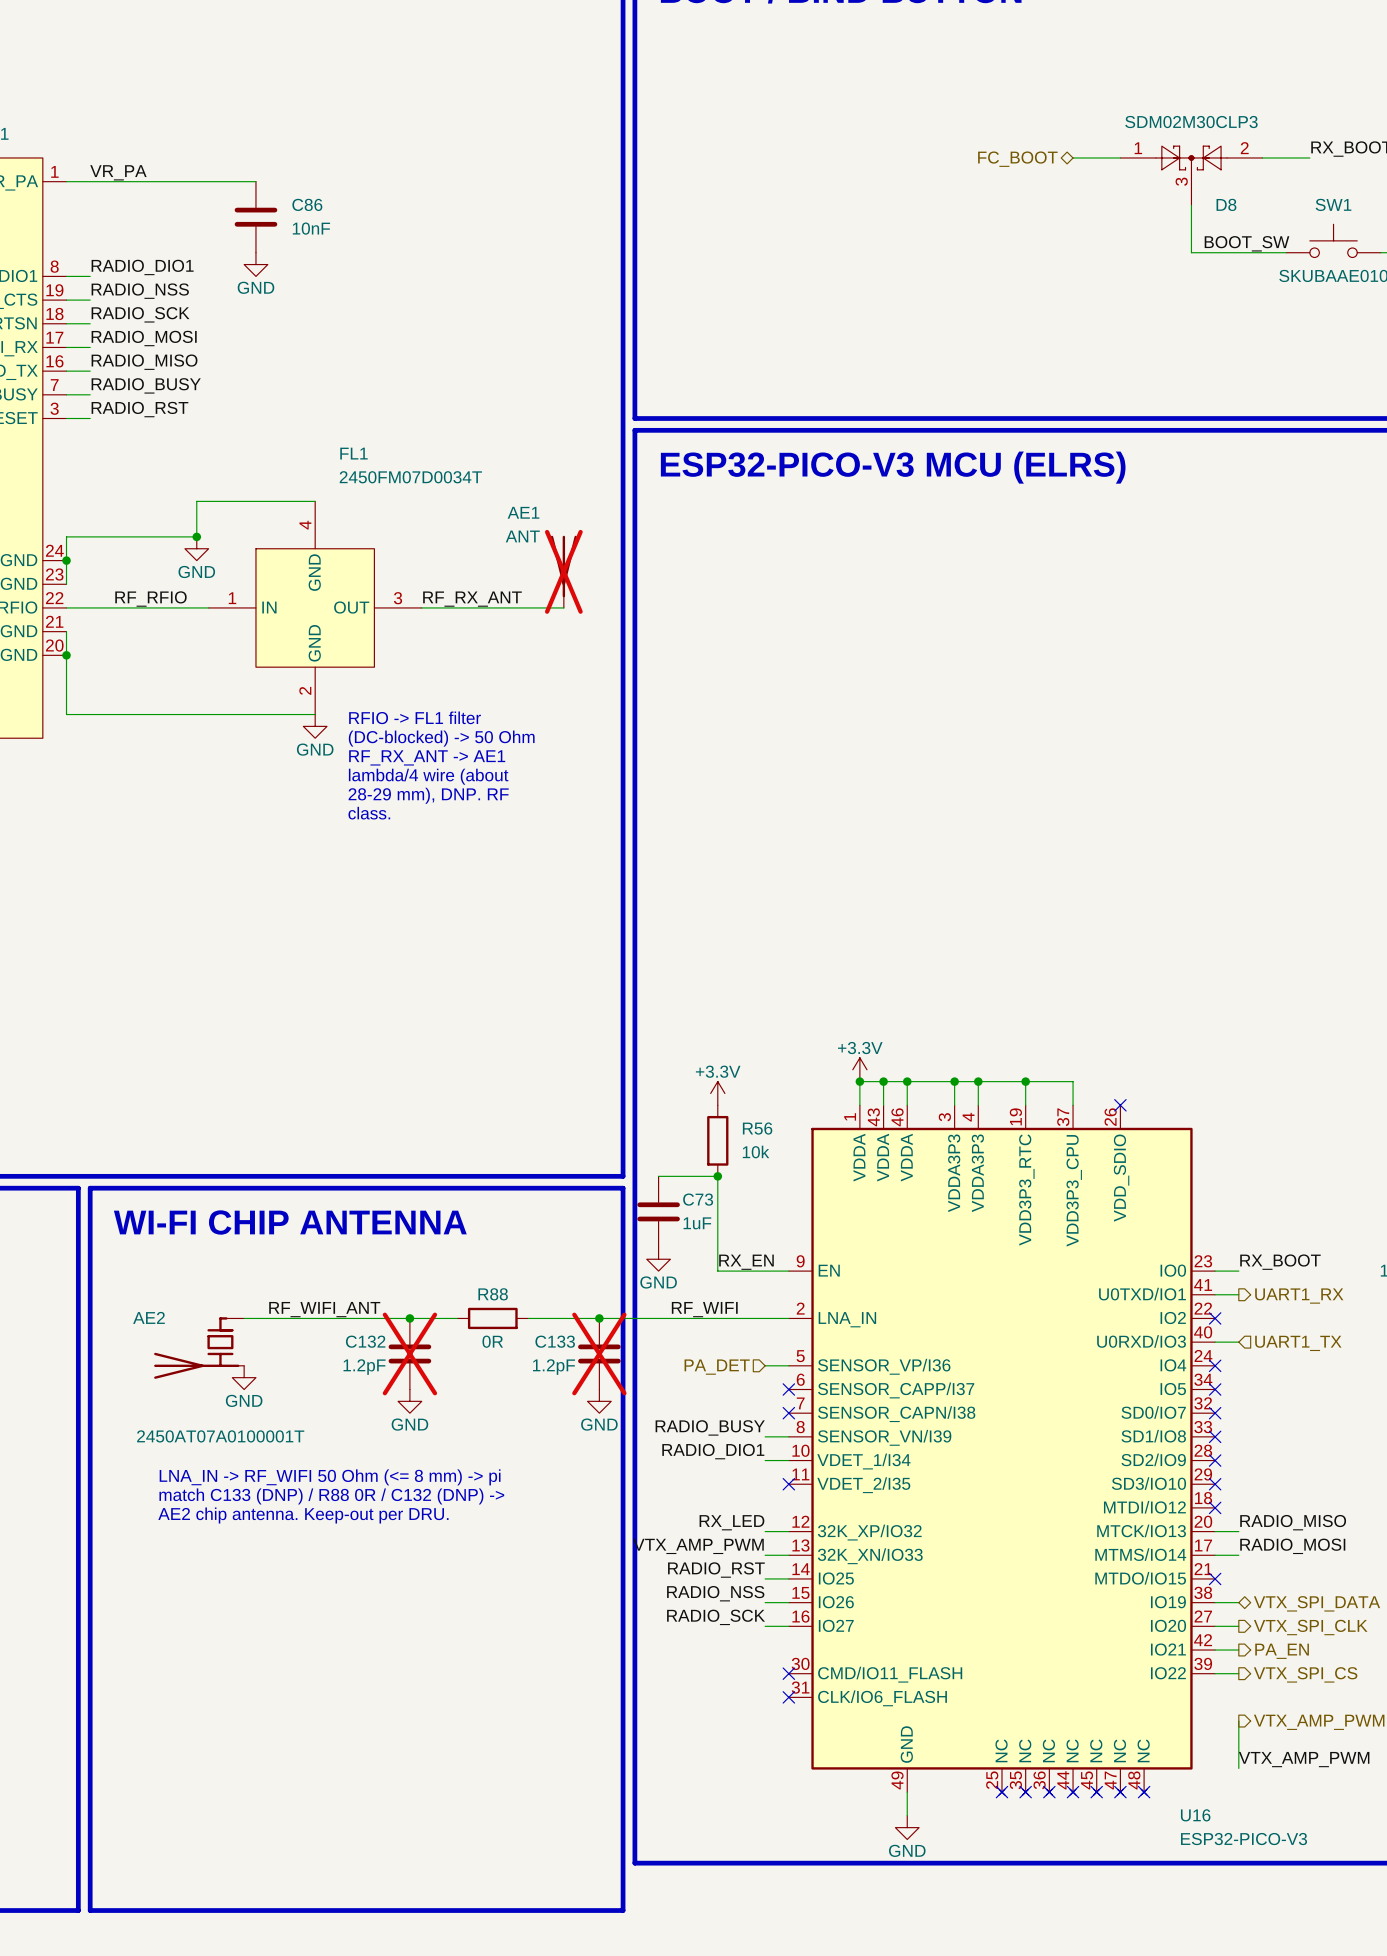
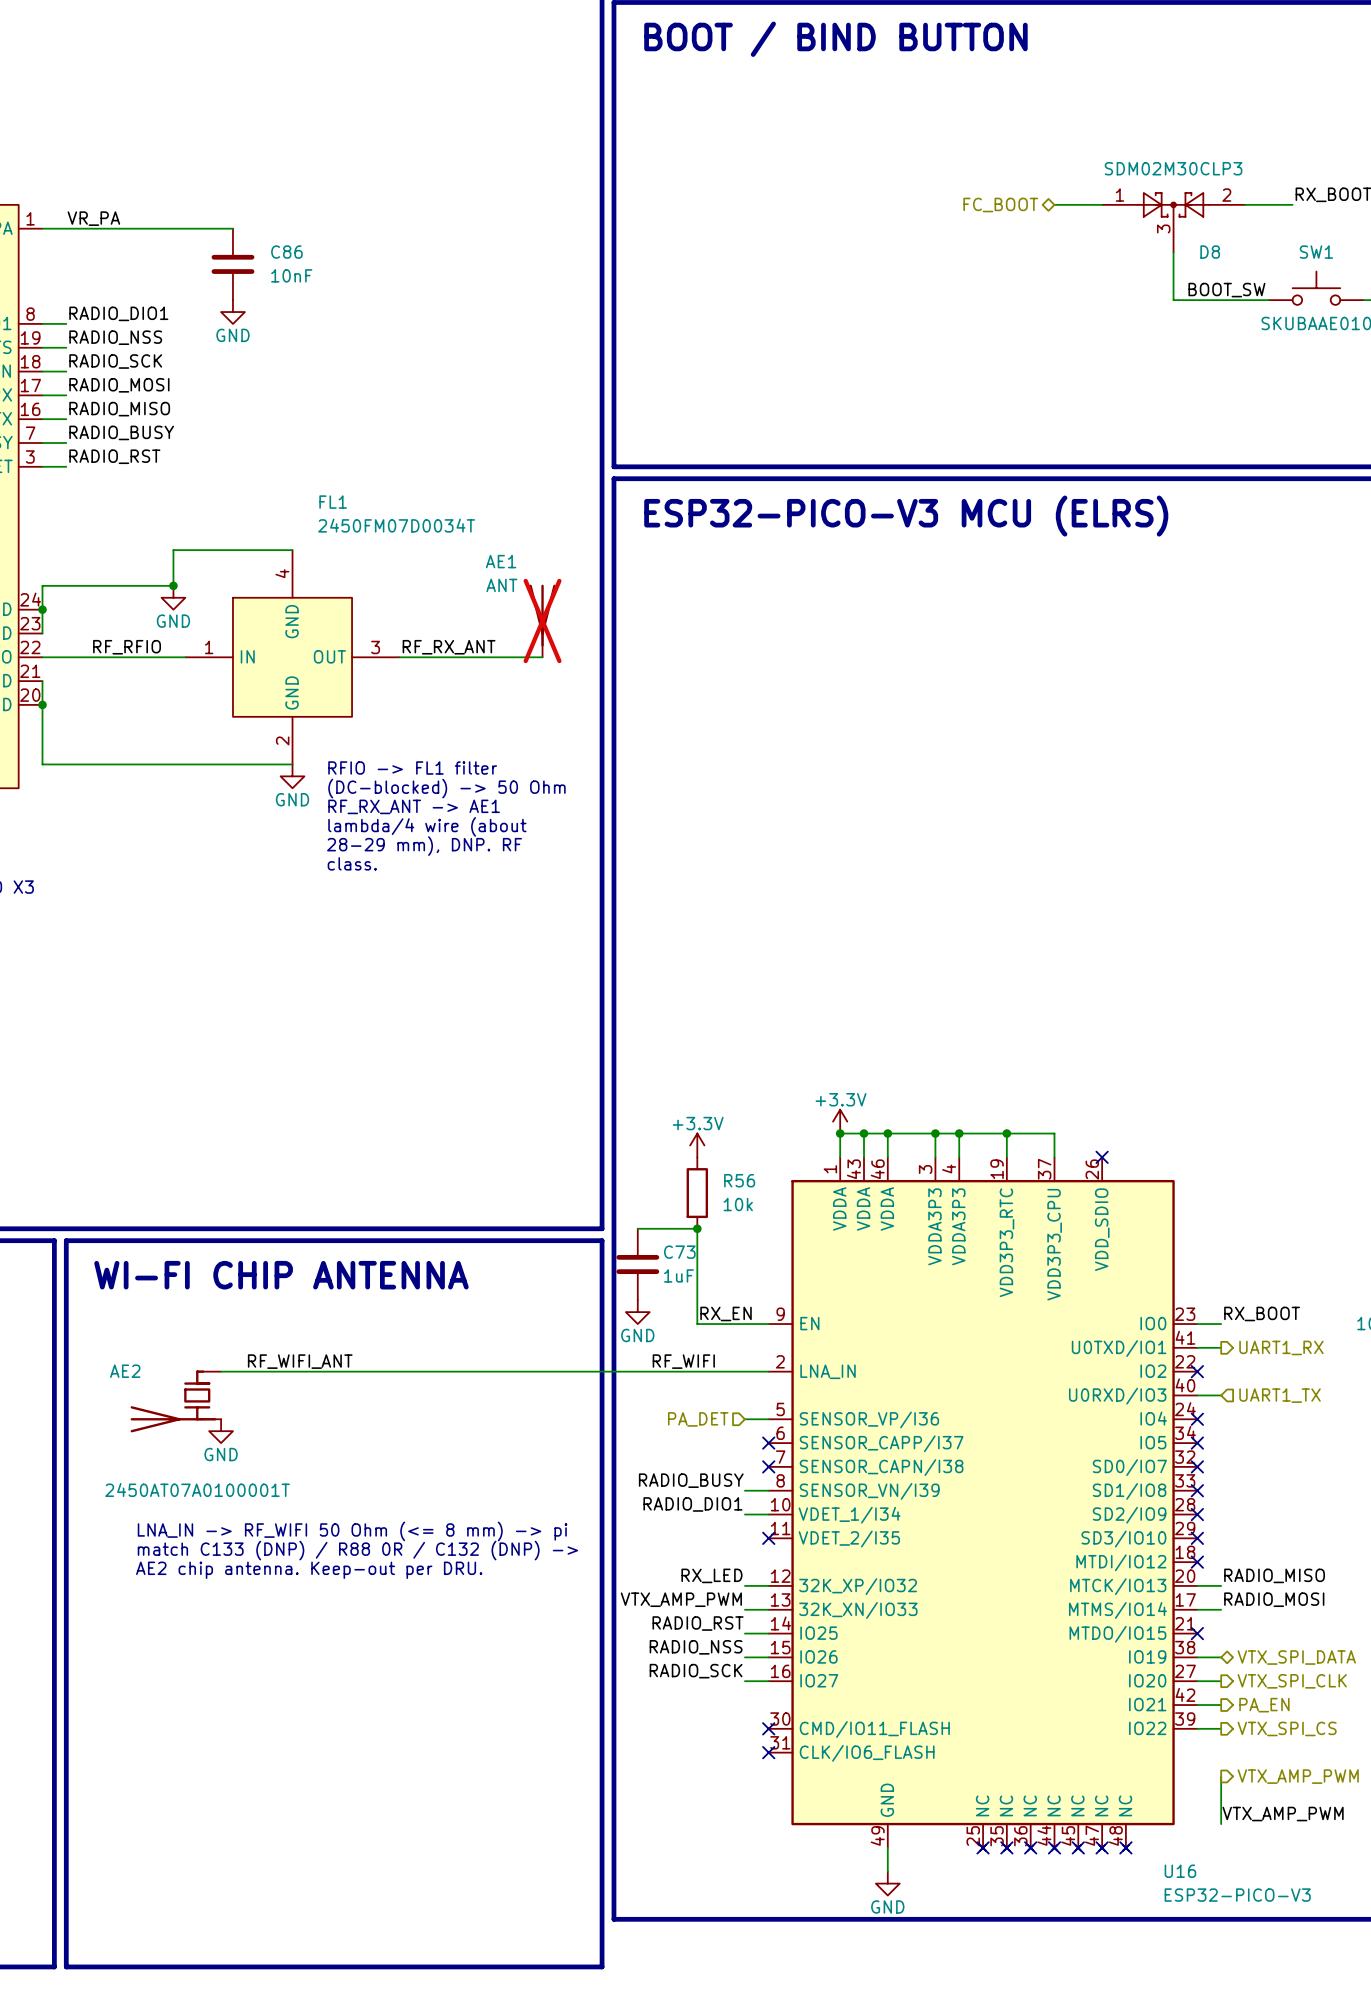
junction: (409, 1318) -> none
wire: none -> (435, 1371) (506, 1371)
R88: 0R (492, 1318) -> none
junction: (599, 1318) -> none
C132: 1.2pF (409, 1353) -> none
C133: 1.2pF (599, 1353) -> none
power symbol: GND (409, 1401) -> none
power symbol: GND (599, 1401) -> none

